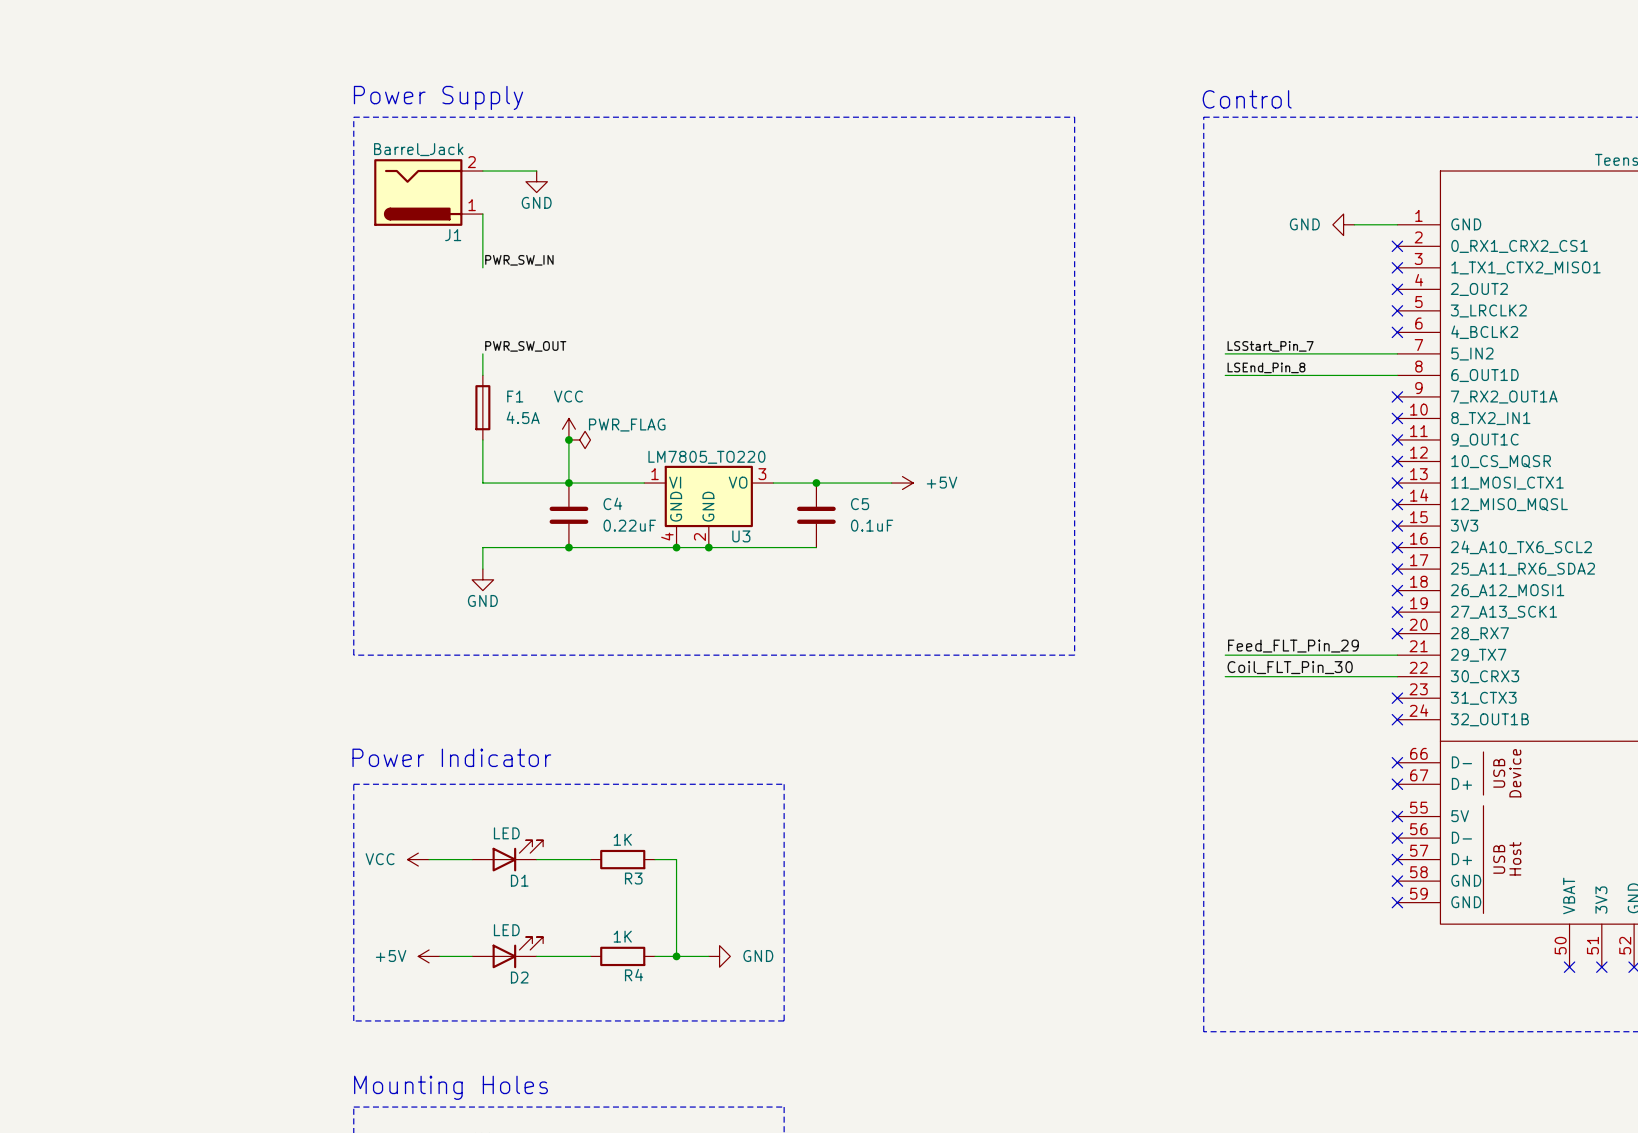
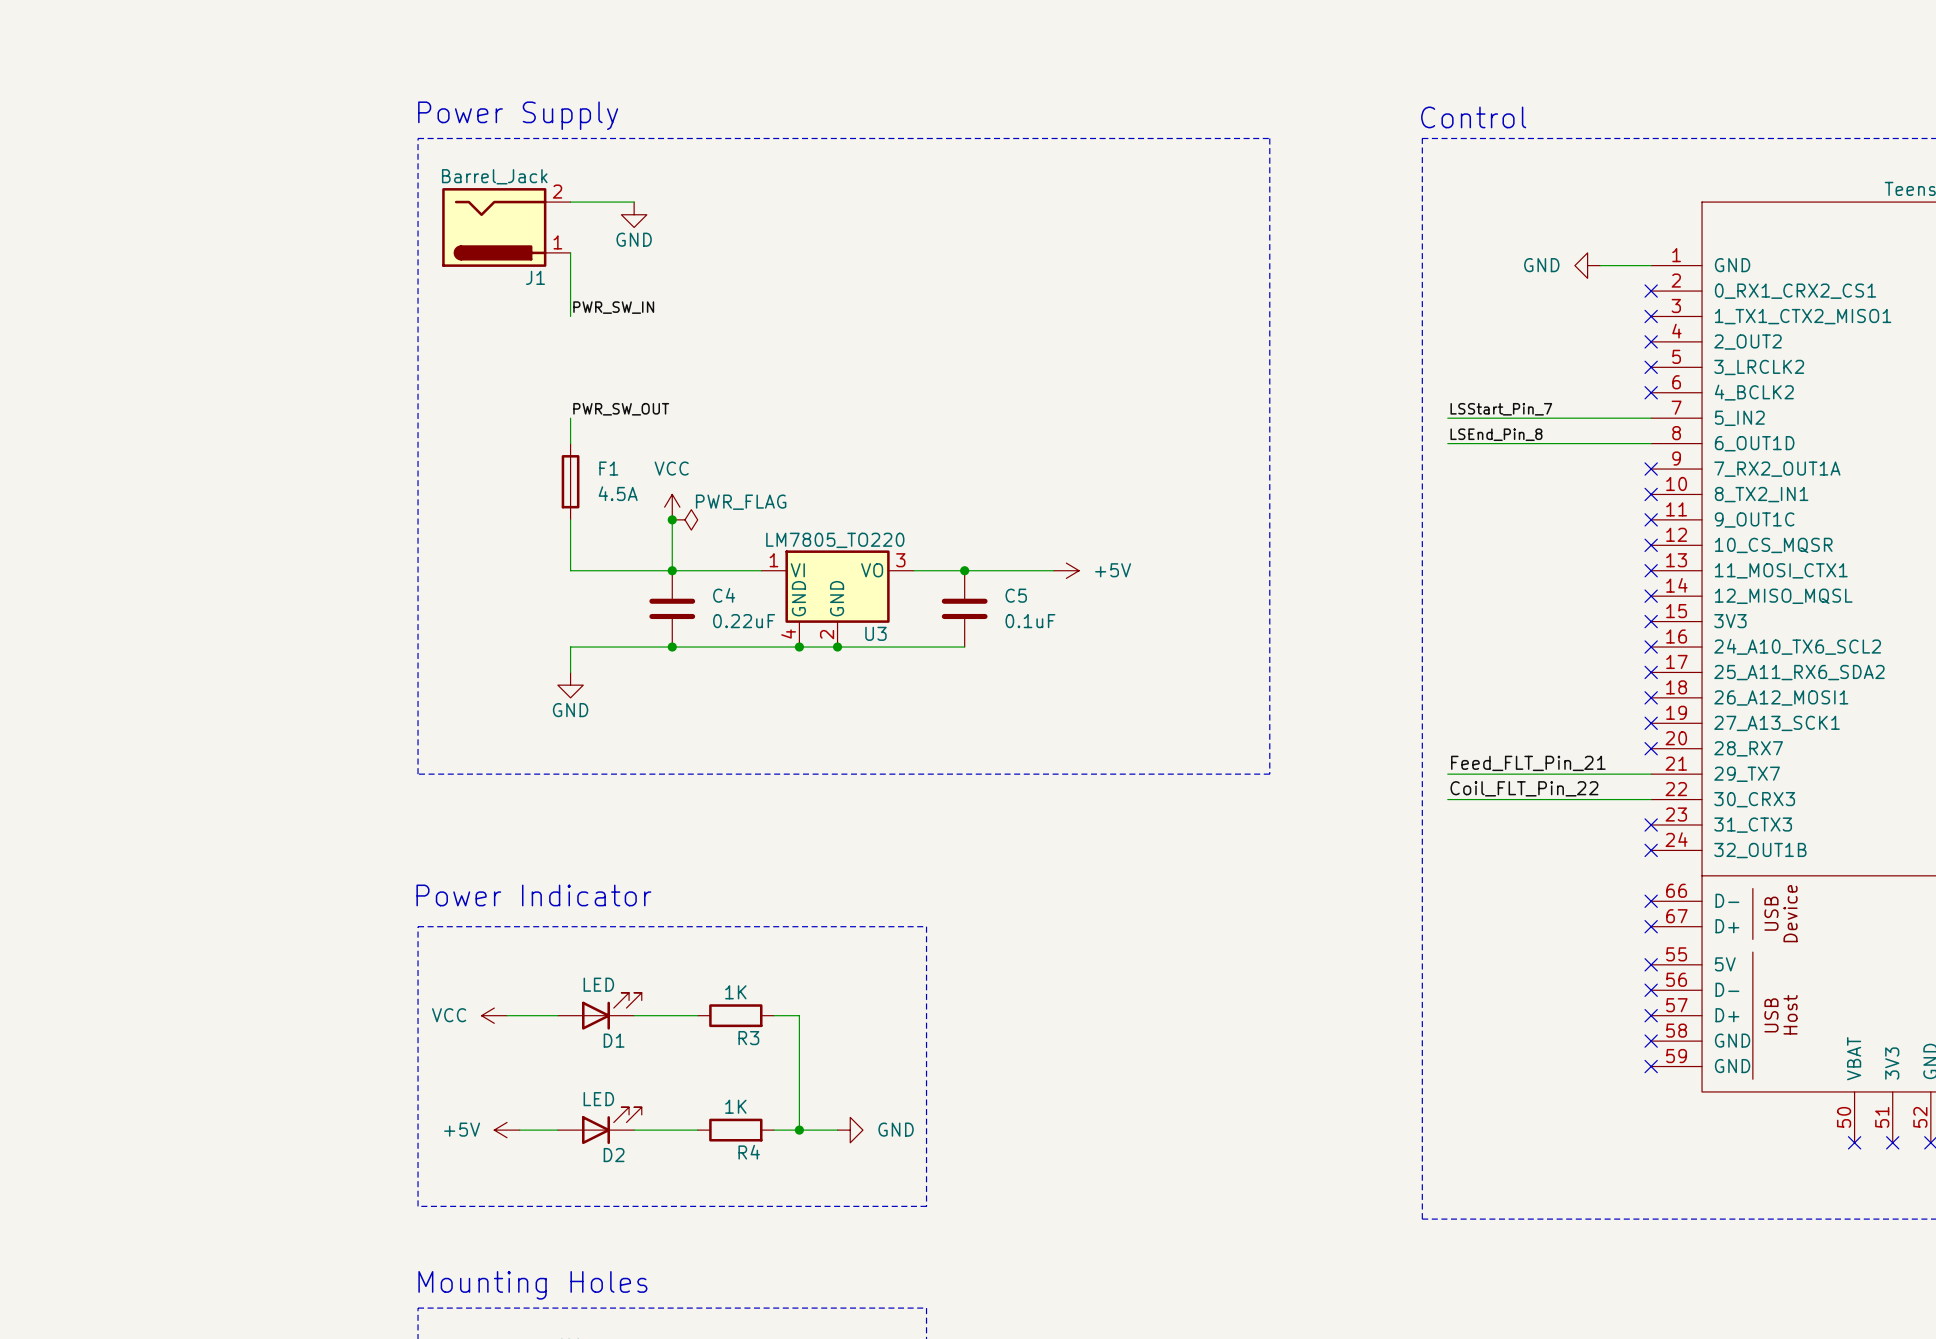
label: Feed_FLT_Pin_29 (1293, 646) -> Feed_FLT_Pin_21 (1528, 763)
label: Coil_FLT_Pin_30 (1290, 667) -> Coil_FLT_Pin_22 (1524, 788)

